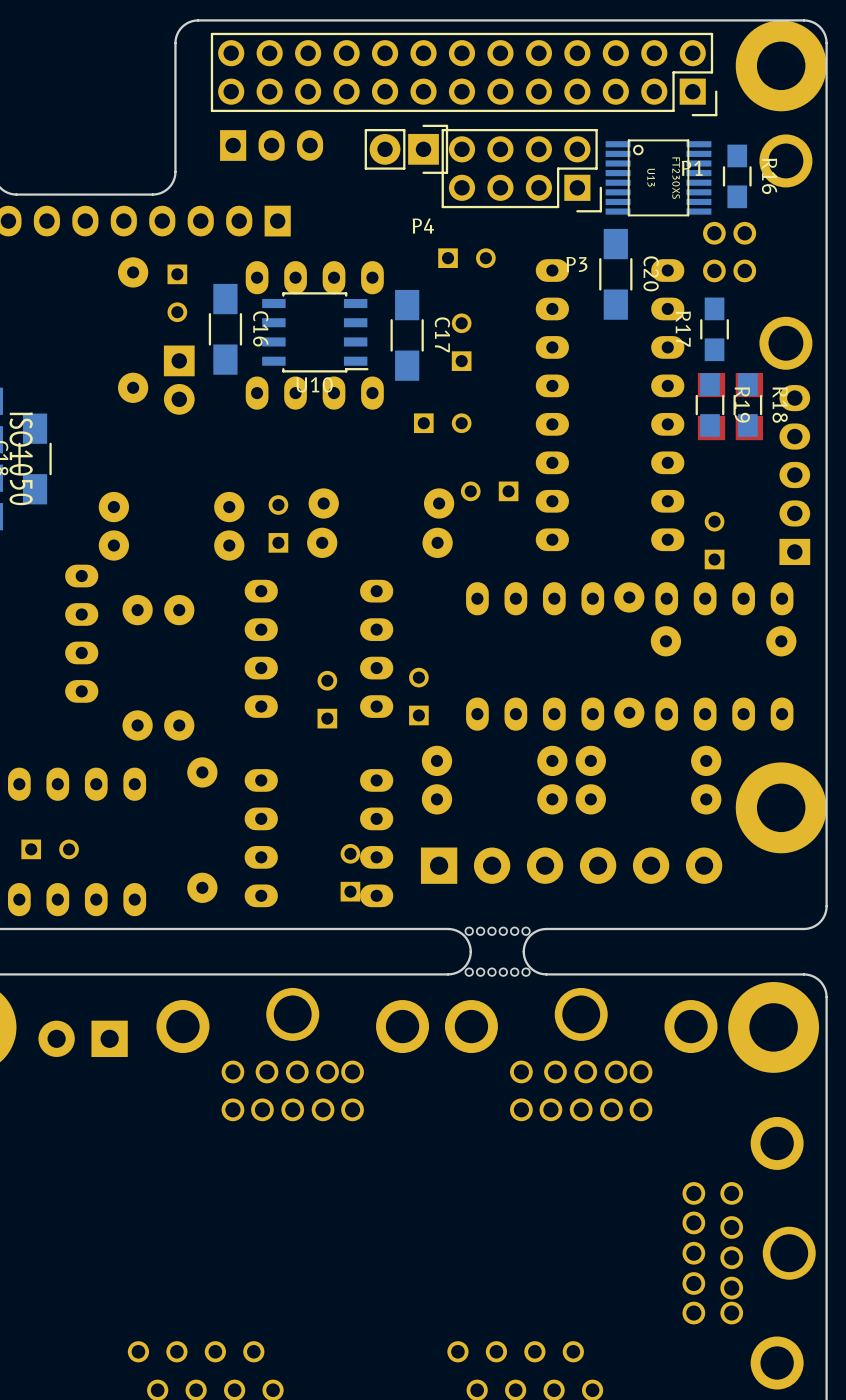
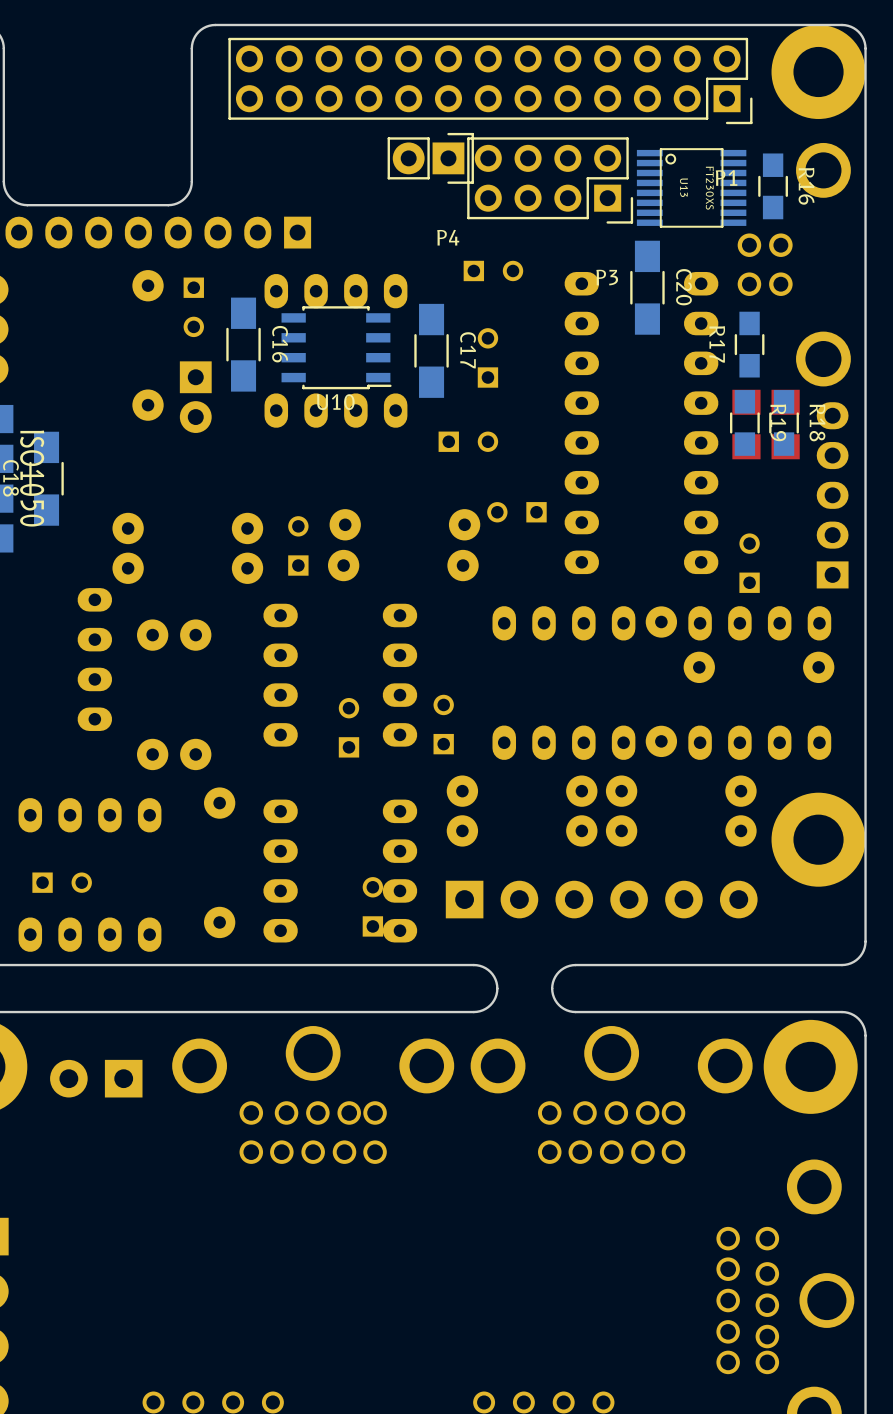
part: (271, 145) -> none
part: (497, 931) -> none
part: (497, 972) -> none

